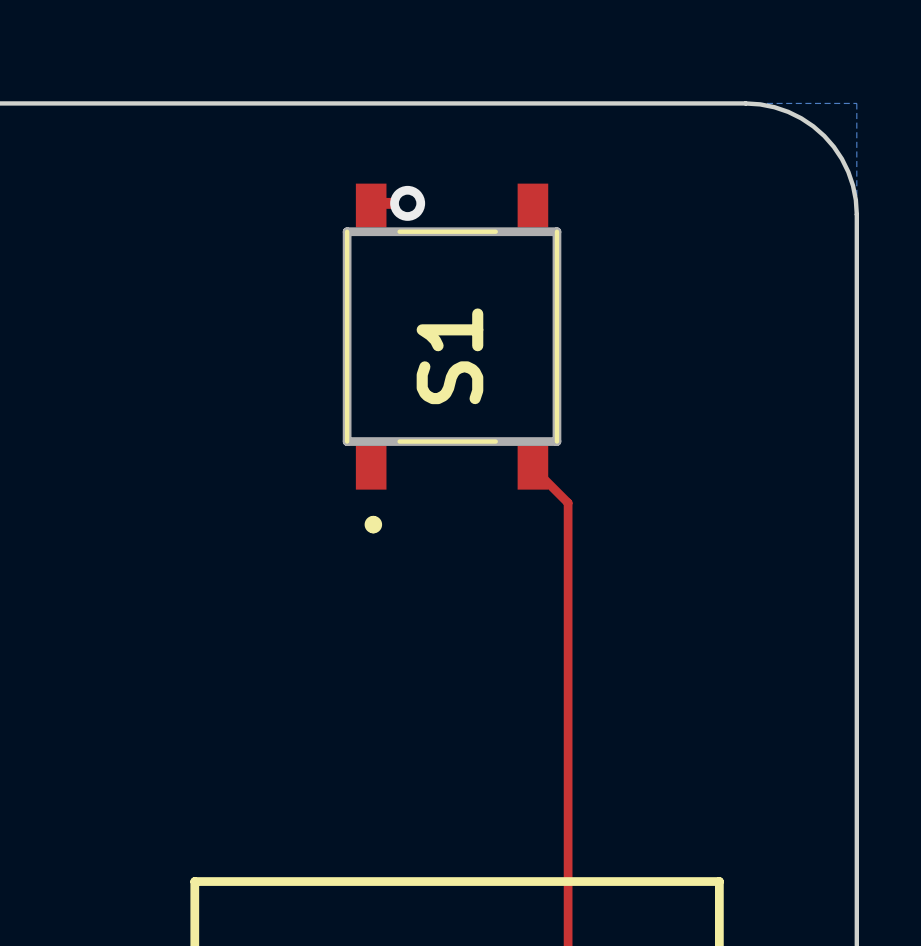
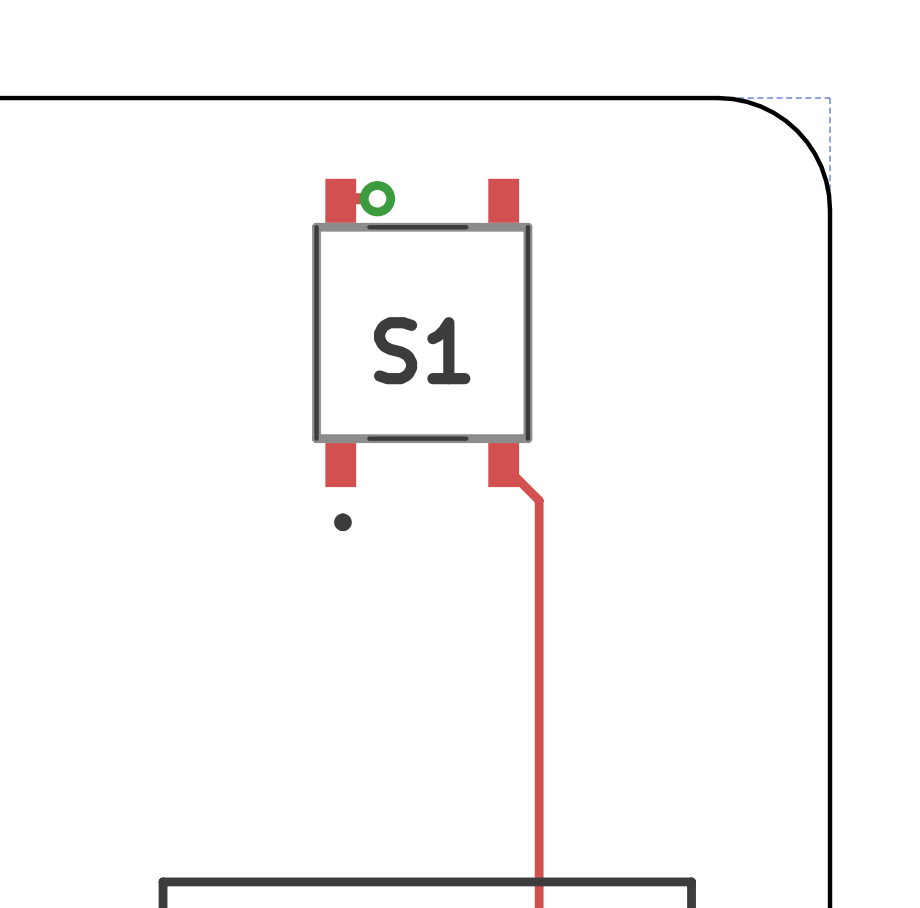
S1 name rotation: 0° (449, 356) -> 90° clockwise (422, 350)

